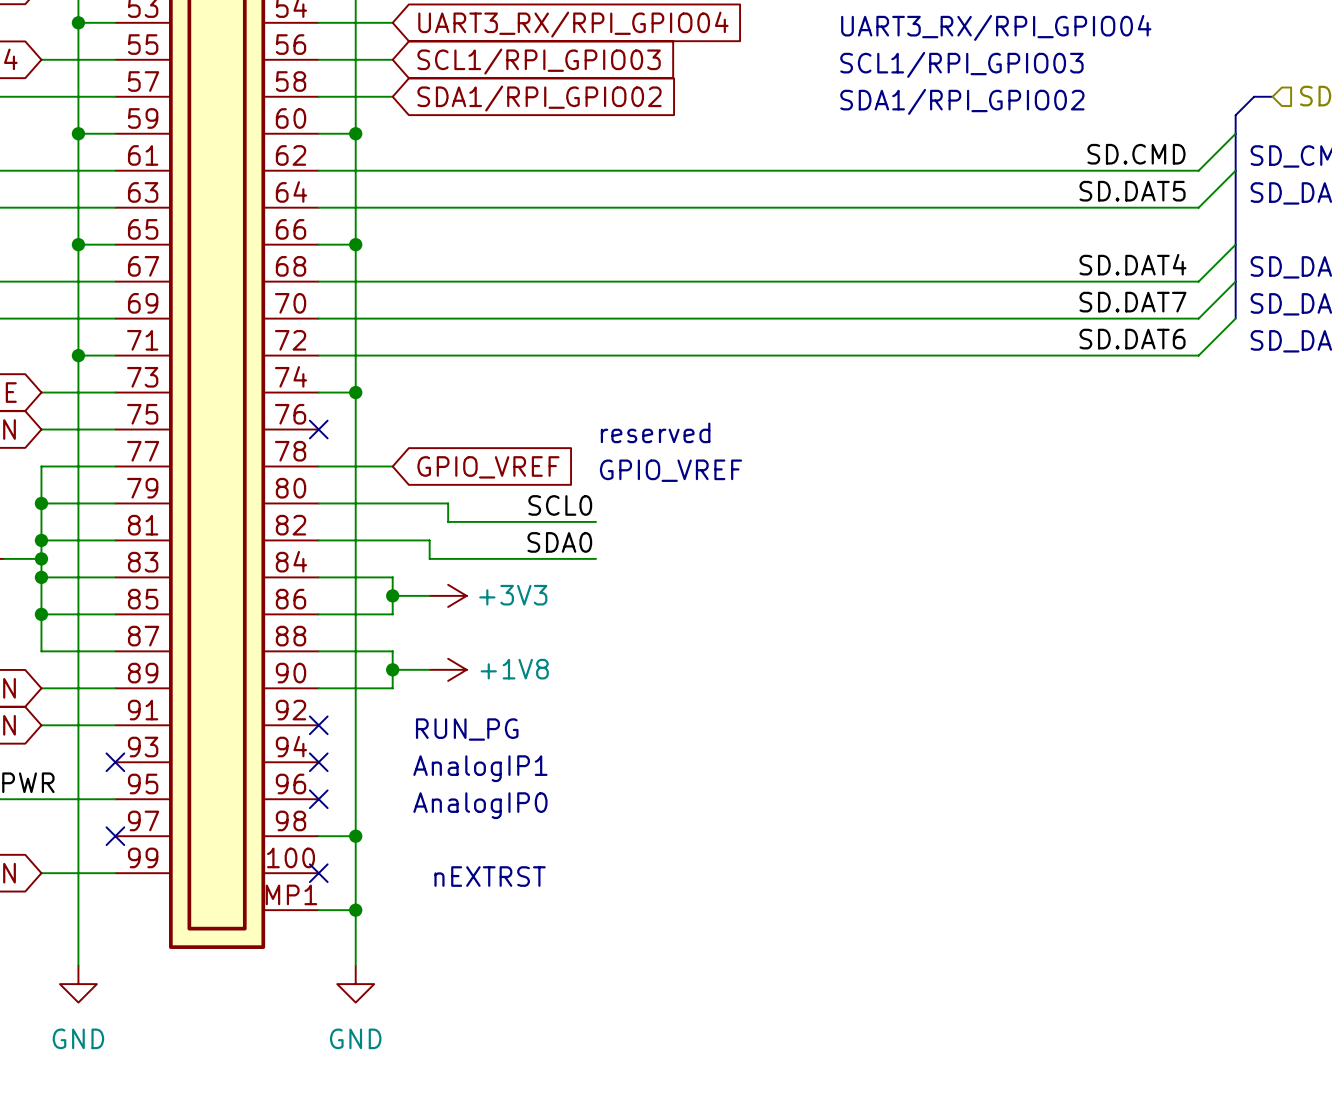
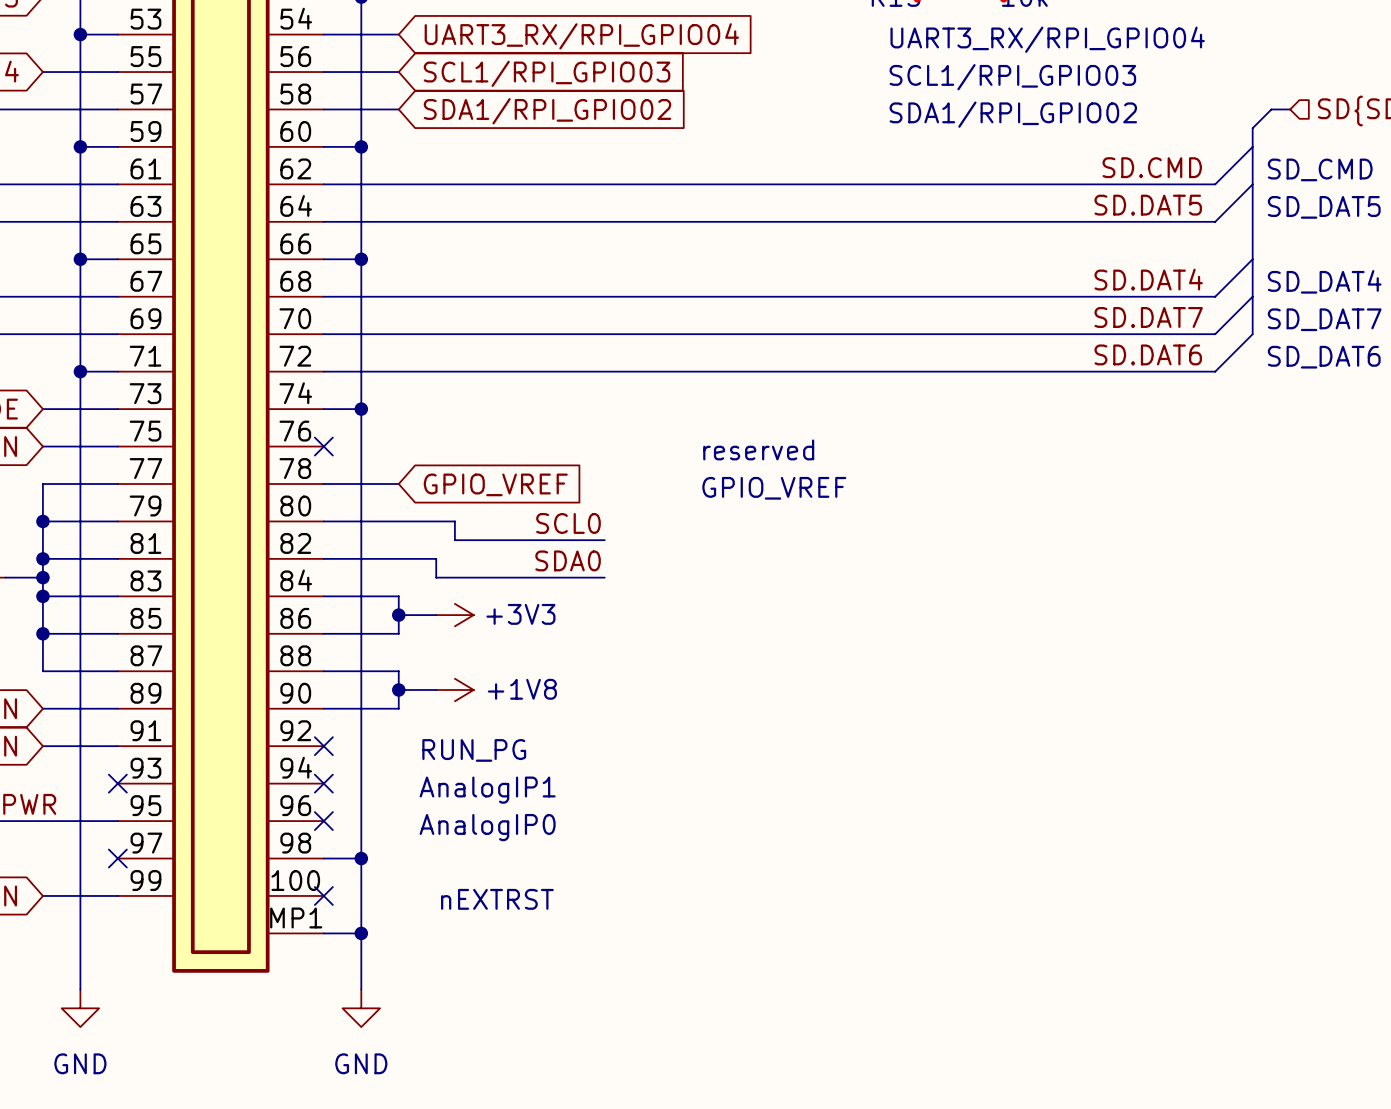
text position: UART3_RX/RPI_GPIO04 (996, 27) -> UART3_RX/RPI_GPIO04 (1047, 39)
text position: SCL1/RPI_GPIO03 (961, 64) -> SCL1/RPI_GPIO03 (1012, 77)
text position: SDA1/RPI_GPIO02 (962, 101) -> SDA1/RPI_GPIO02 (1013, 114)
text position: reserved (655, 432) -> reserved (758, 449)
text position: GPIO_VREF (671, 470) -> GPIO_VREF (774, 488)

